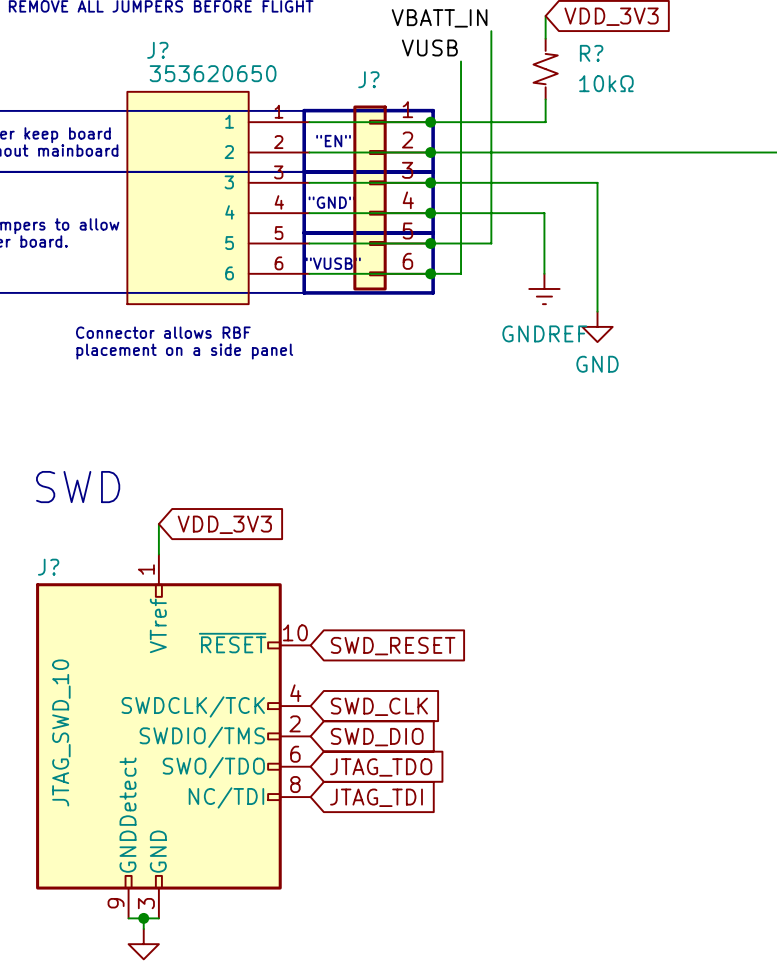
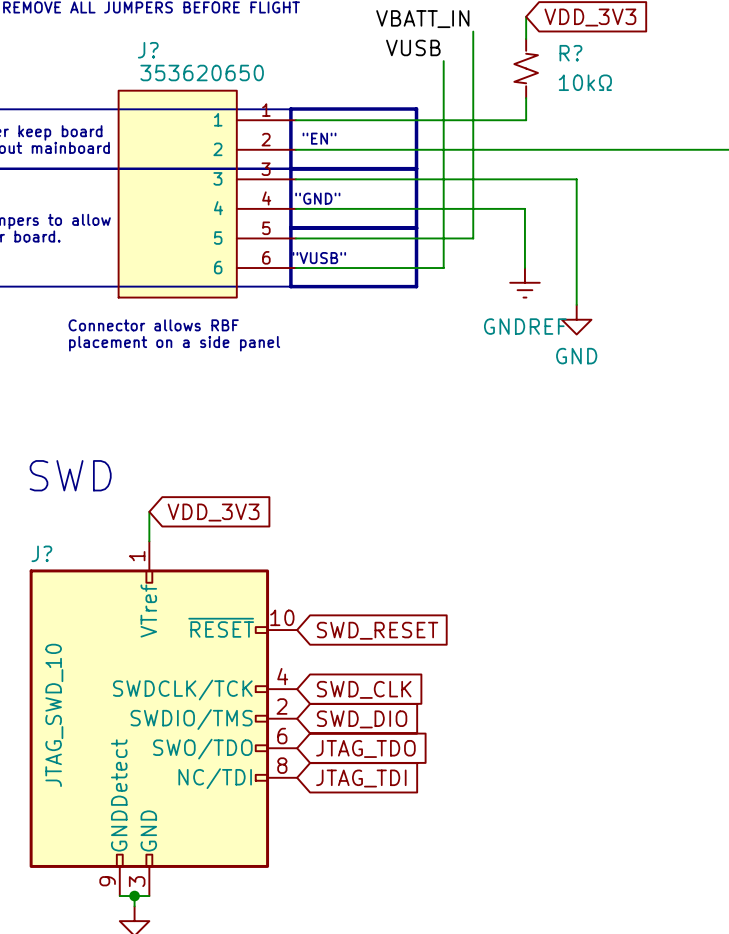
junction: (430, 122) -> none
junction: (430, 152) -> none
junction: (430, 182) -> none
J?: (392, 198) -> none
junction: (430, 213) -> none
junction: (430, 243) -> none
junction: (430, 273) -> none

